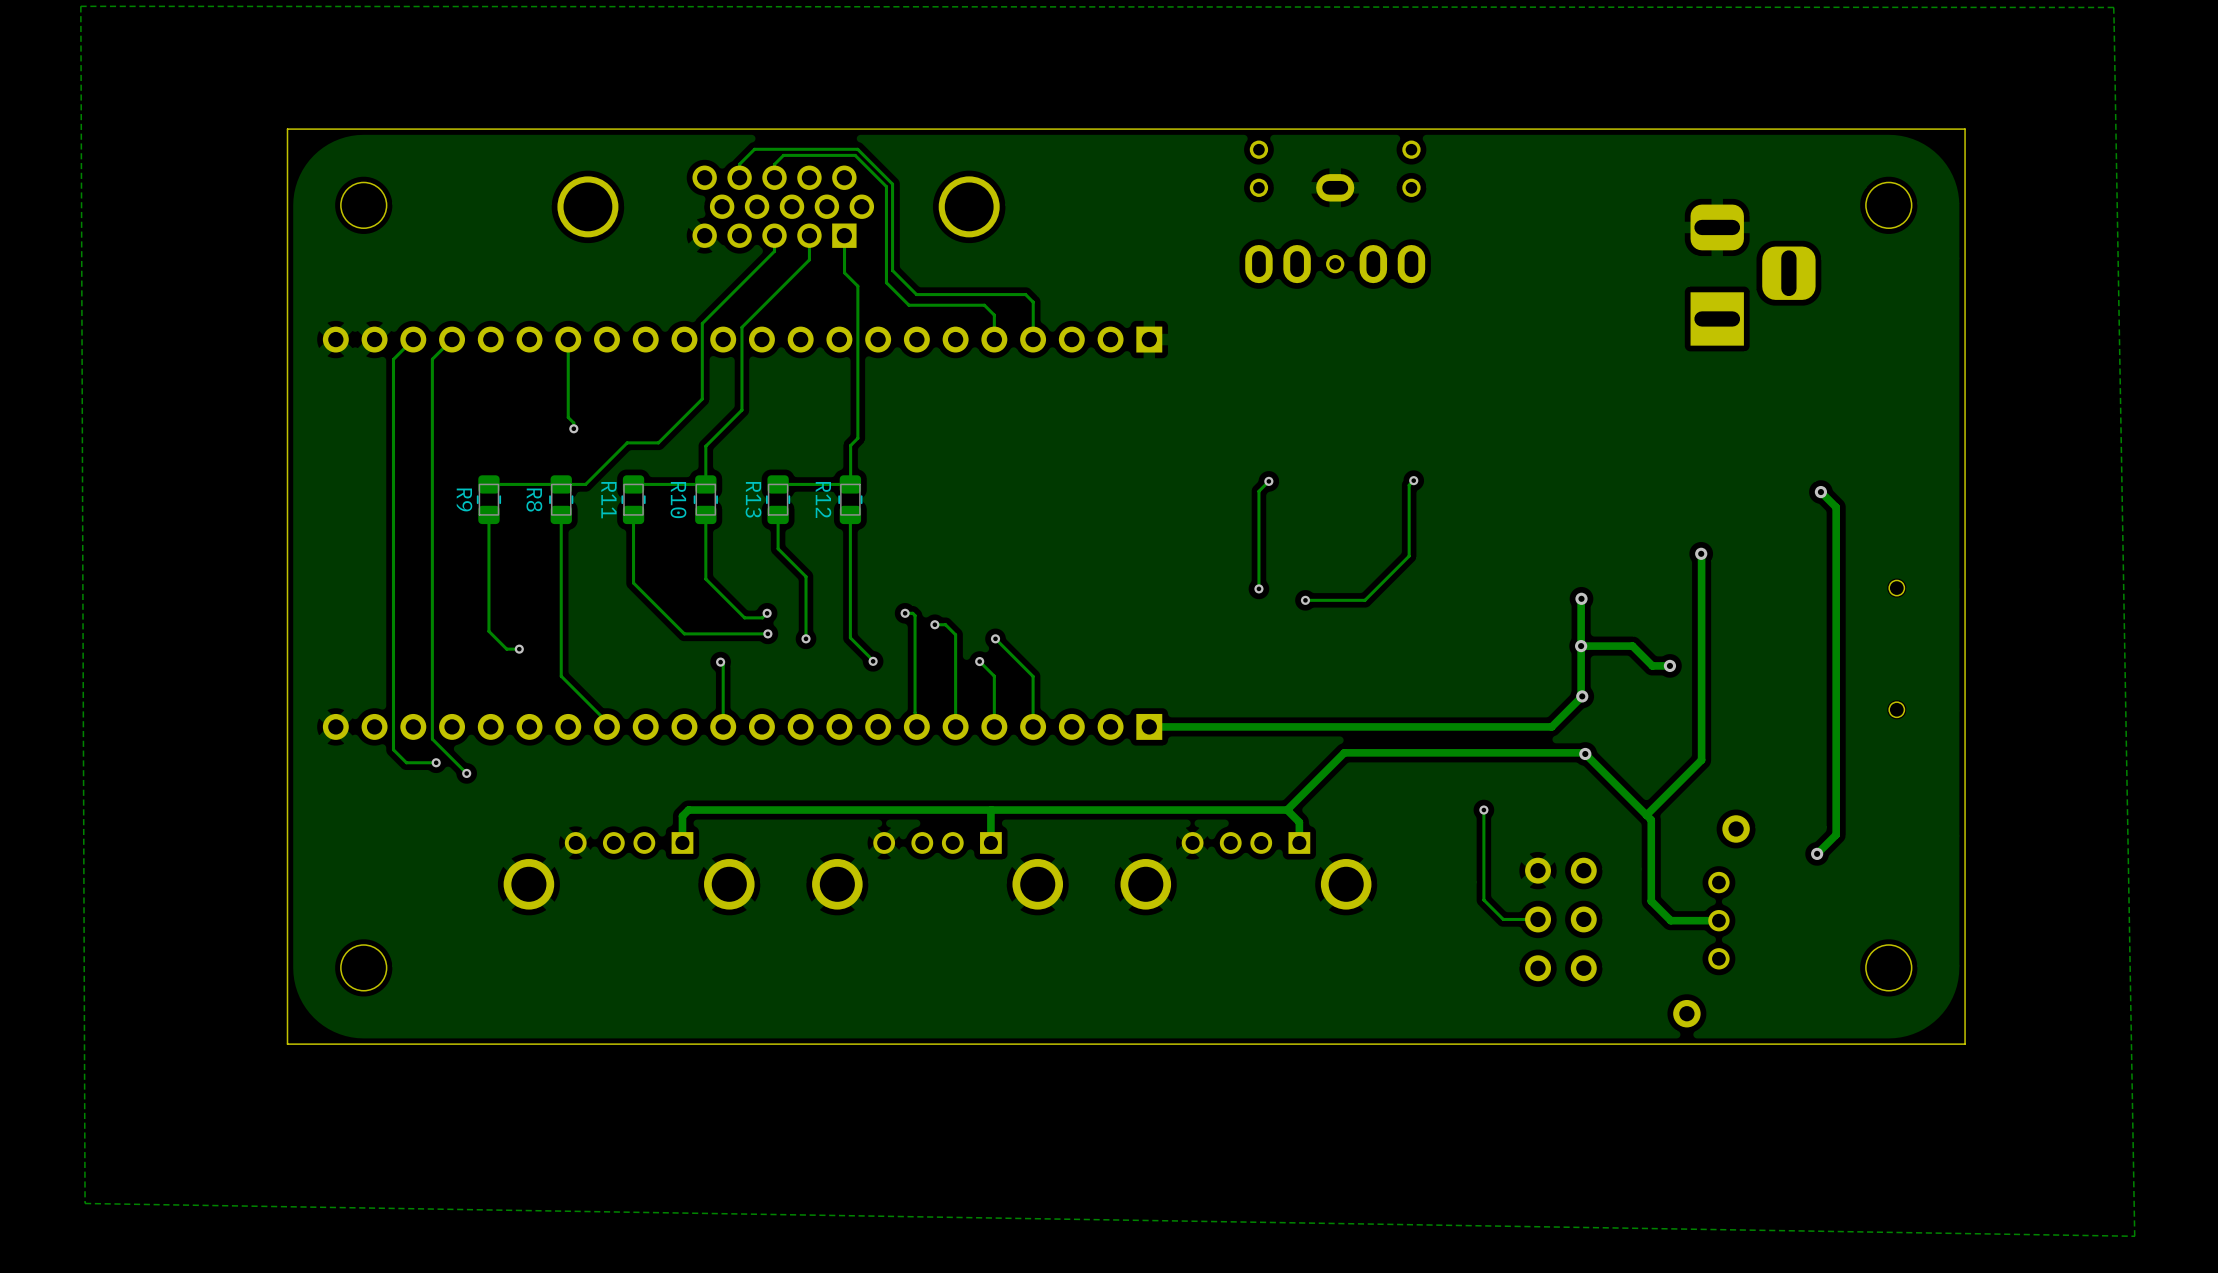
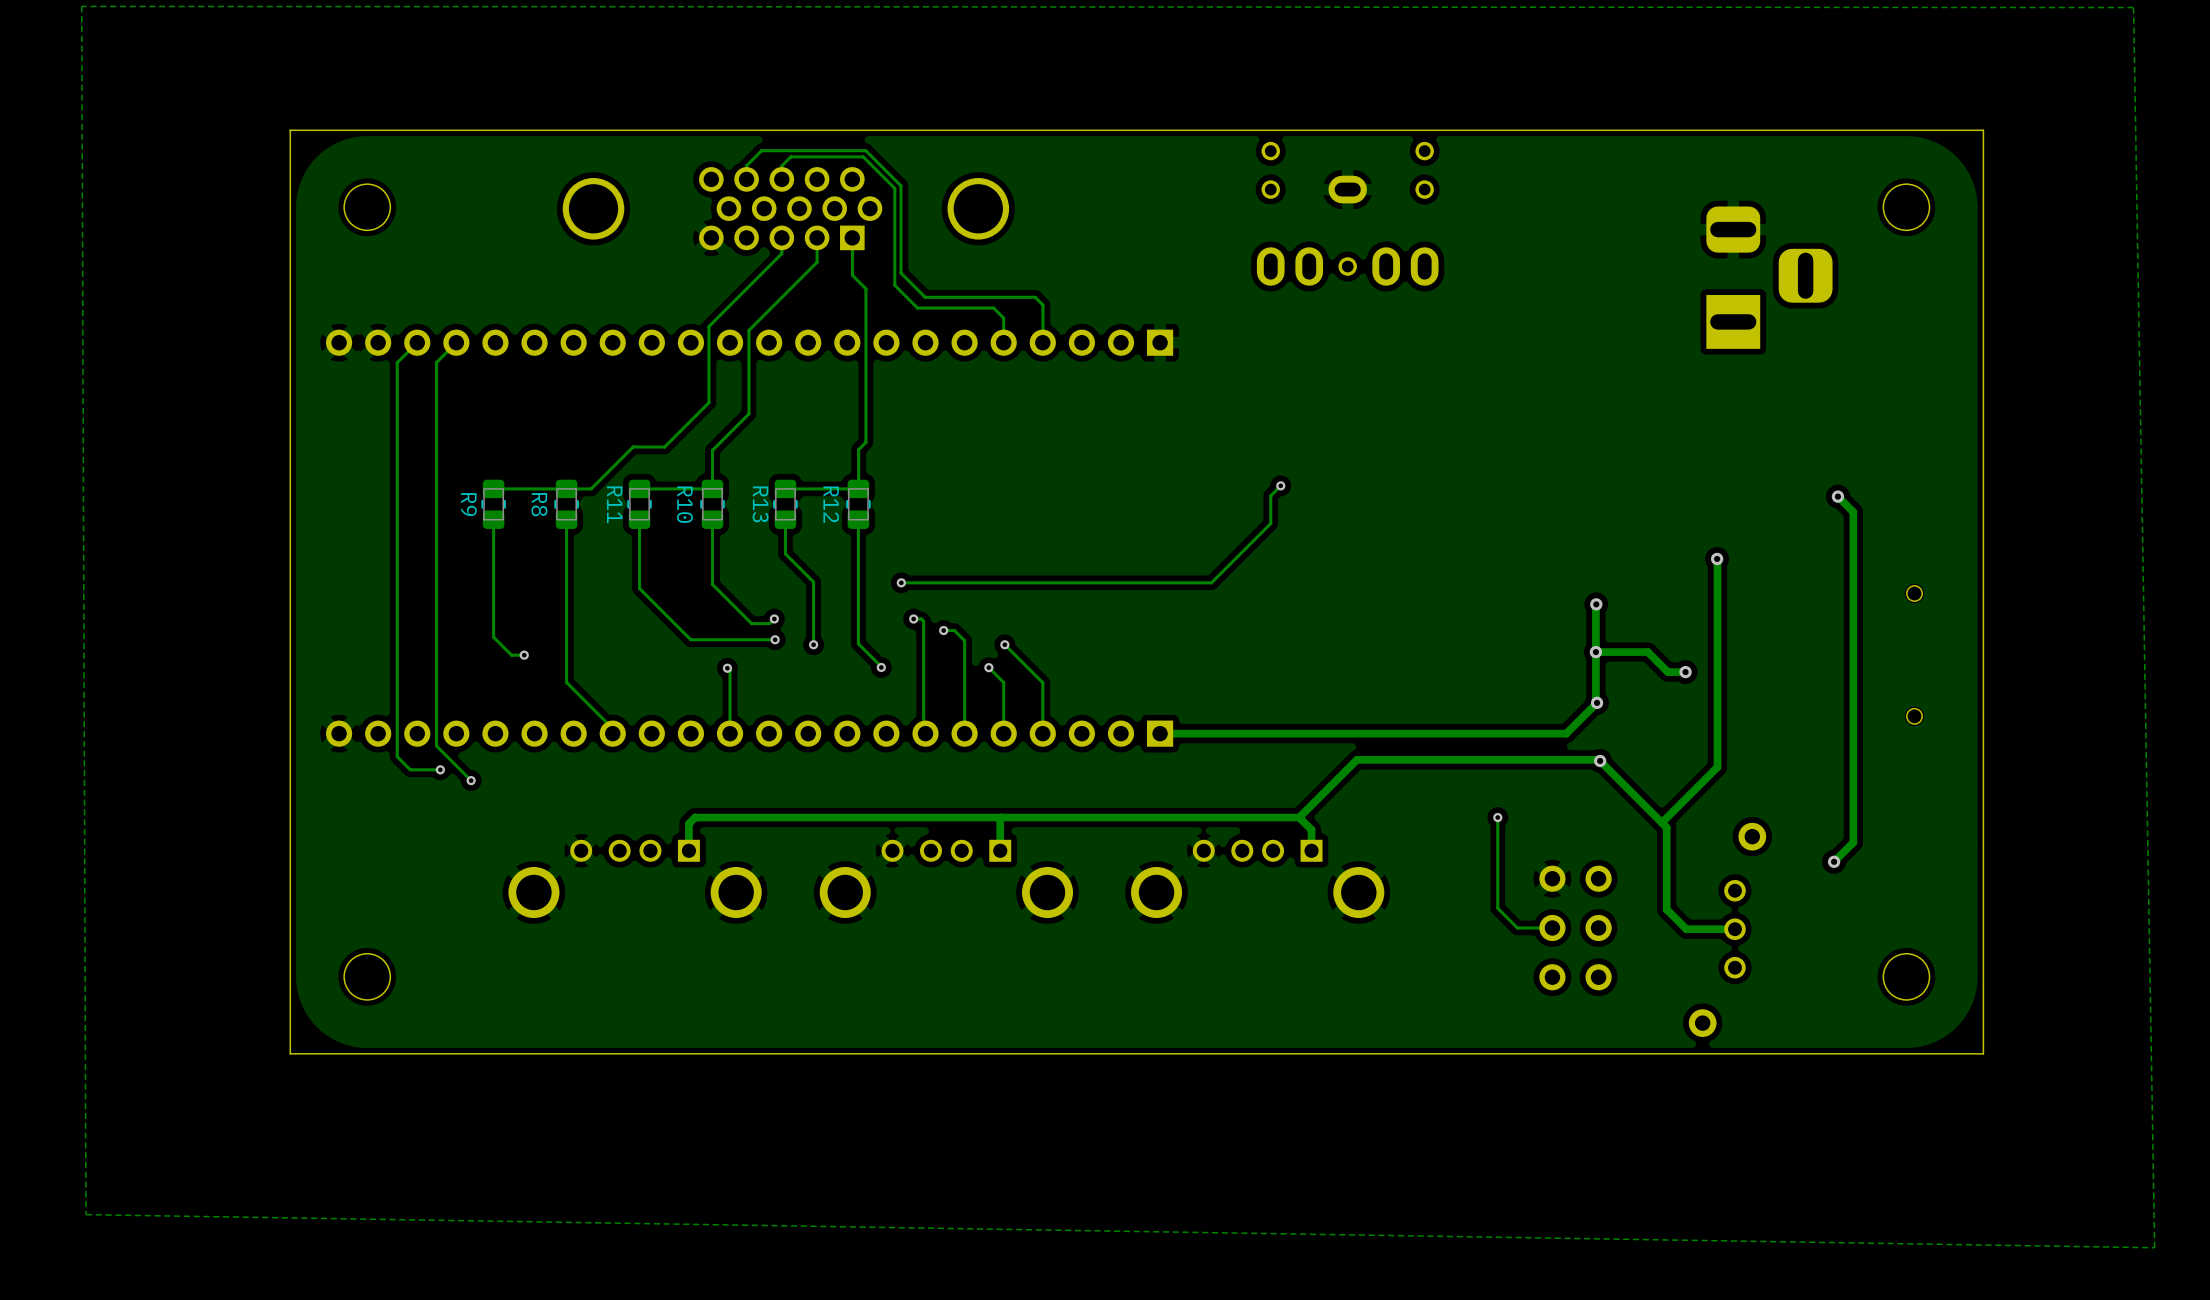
track: (568, 339) (568, 417) (573, 423) (573, 428) -> none
via: (573, 428) -> none
track: (1413, 480) (1409, 485) (1409, 556) (1364, 600) (1305, 600) -> none
via: (1413, 480) -> none
track: (1258, 518) (1258, 588) -> (1270, 523) (1211, 582) (901, 582)
via: none -> (901, 582)
via: (1258, 588) -> none
via: (1305, 600) -> none

